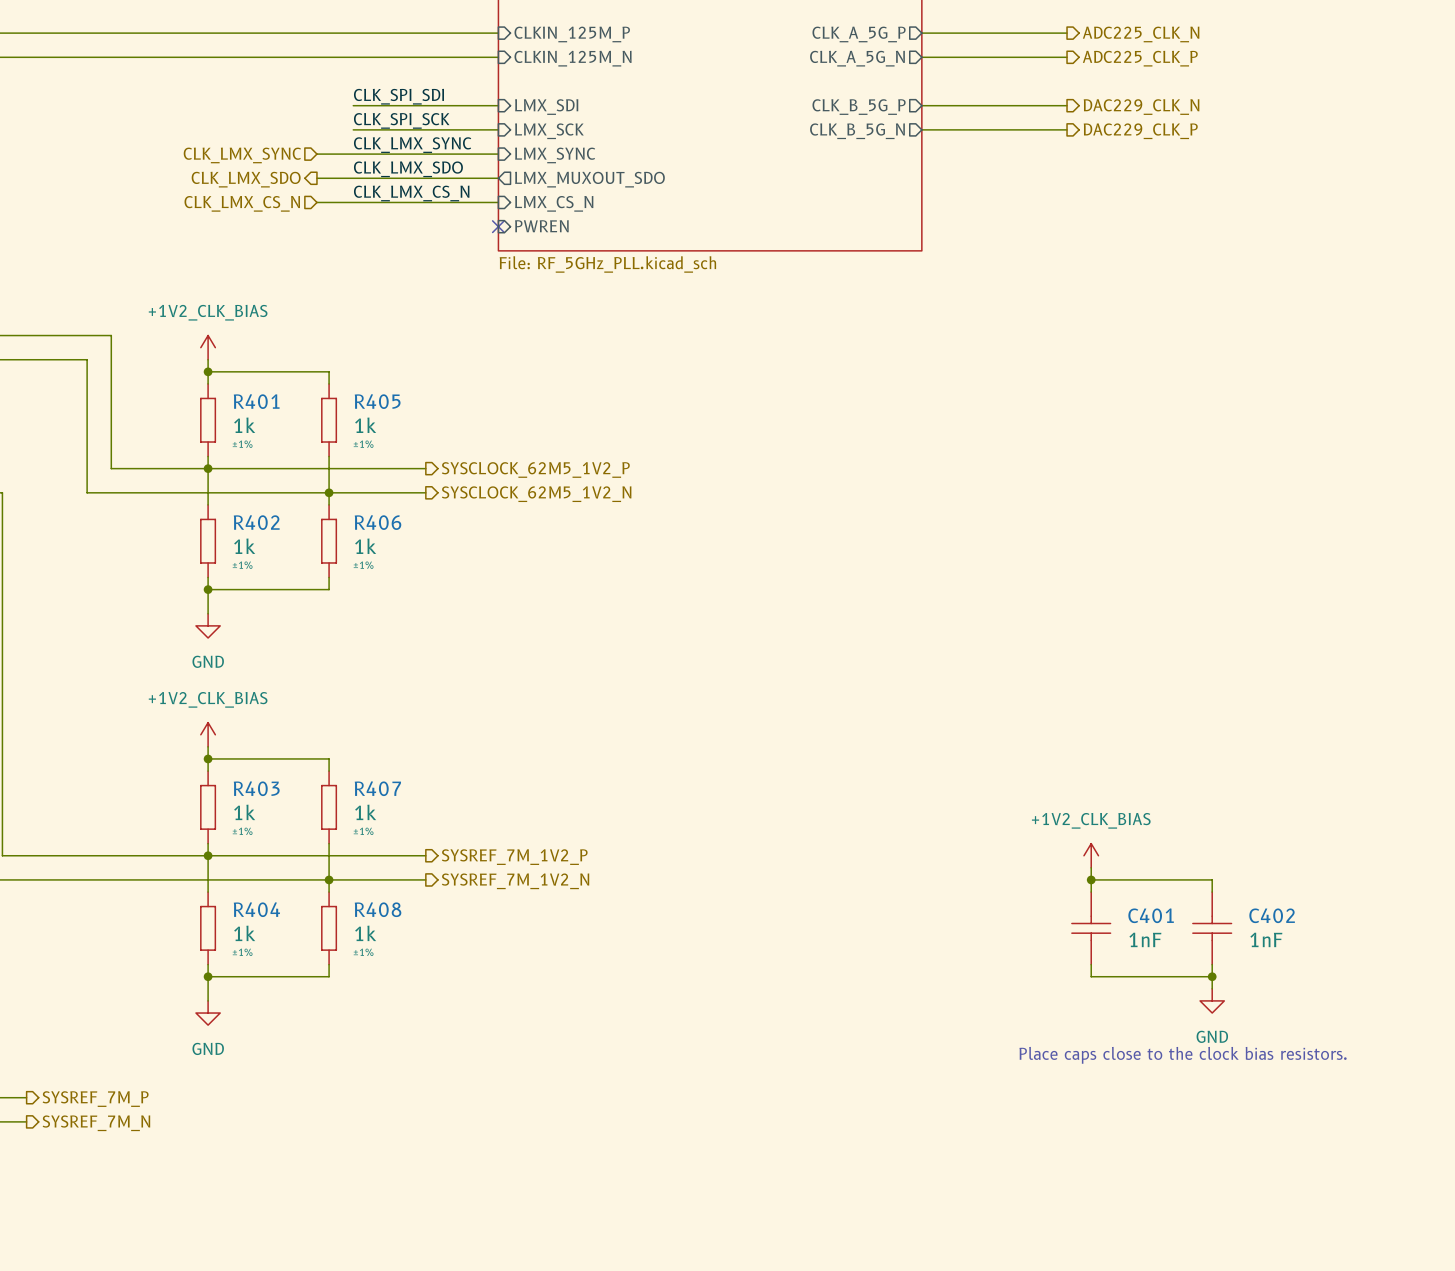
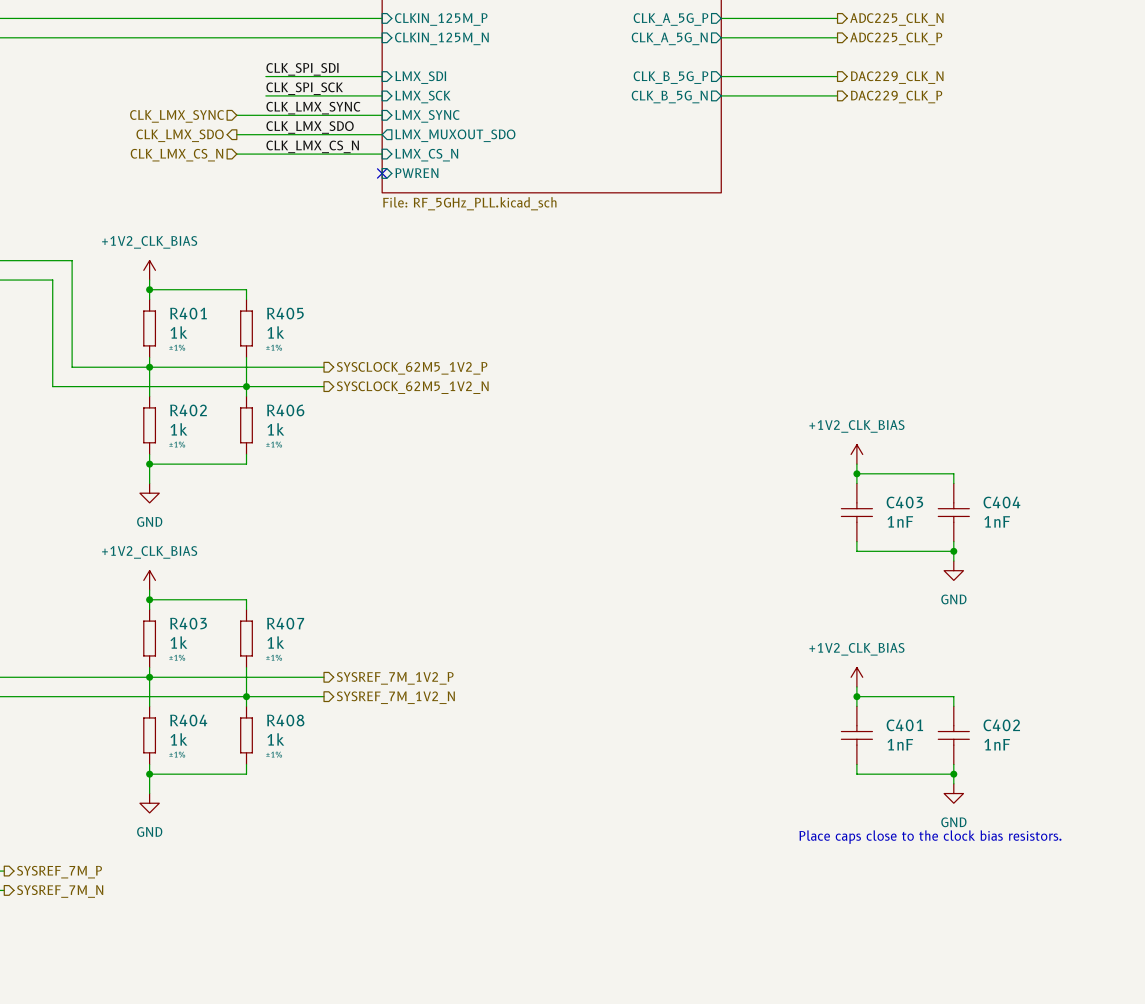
power symbol: none -> +1V2_CLK_BIAS (856, 454)
wire: none -> (856, 464) (856, 483)
wire: none -> (856, 473) (953, 473) (953, 483)
junction: none -> (856, 473)
C403: none -> 1nF (856, 512)
C404: none -> 1nF (953, 512)
wire: none -> (856, 541) (856, 551) (953, 551)
wire: none -> (953, 541) (953, 561)
junction: none -> (953, 551)
power symbol: none -> GND (953, 570)

